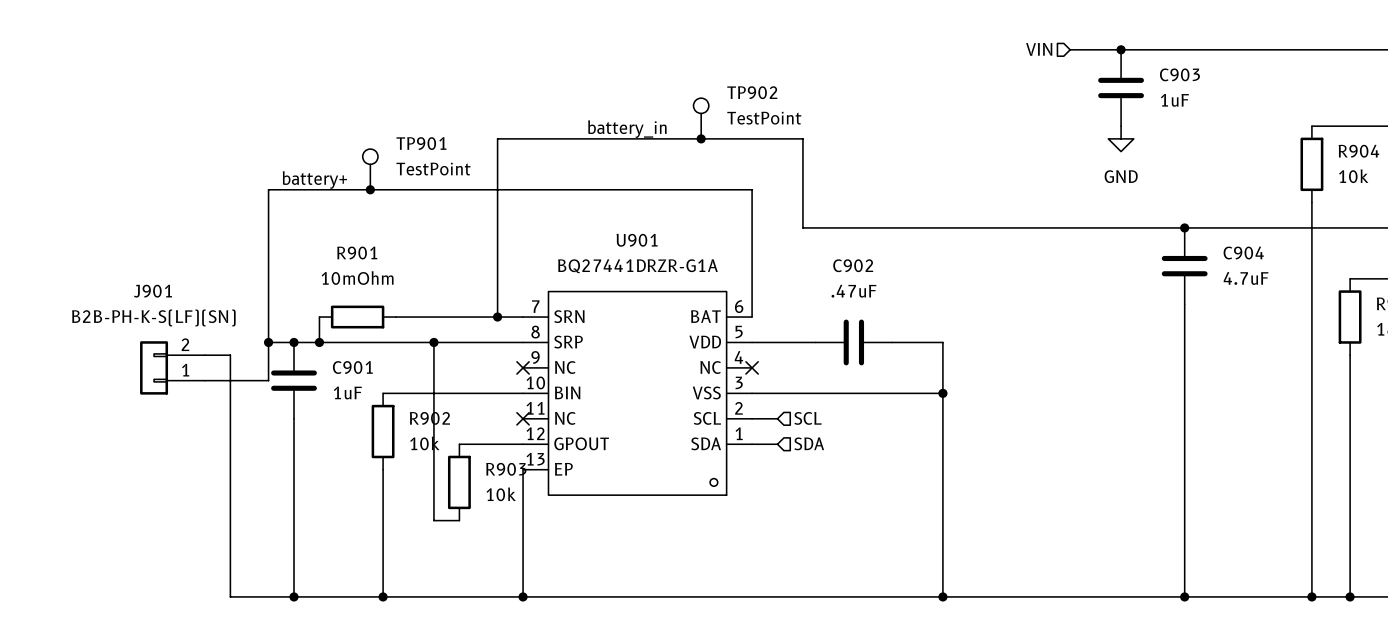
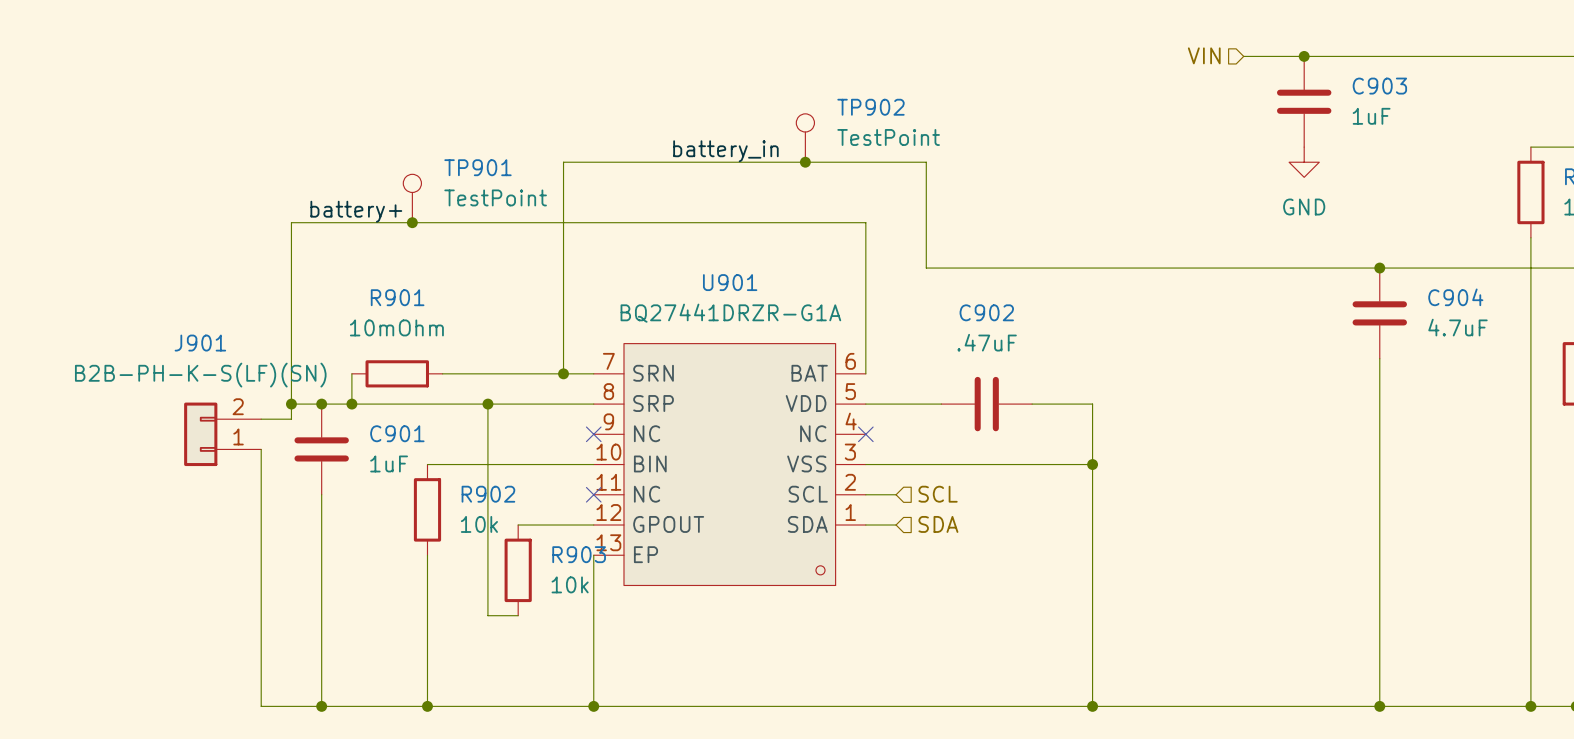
wire: (204, 355) (230, 355) (230, 596) (243, 596) -> (261, 449) (261, 706)
wire: (268, 355) (268, 380) (204, 380) -> (291, 419) (261, 419)
J901 position: (172, 367) -> (222, 434)

